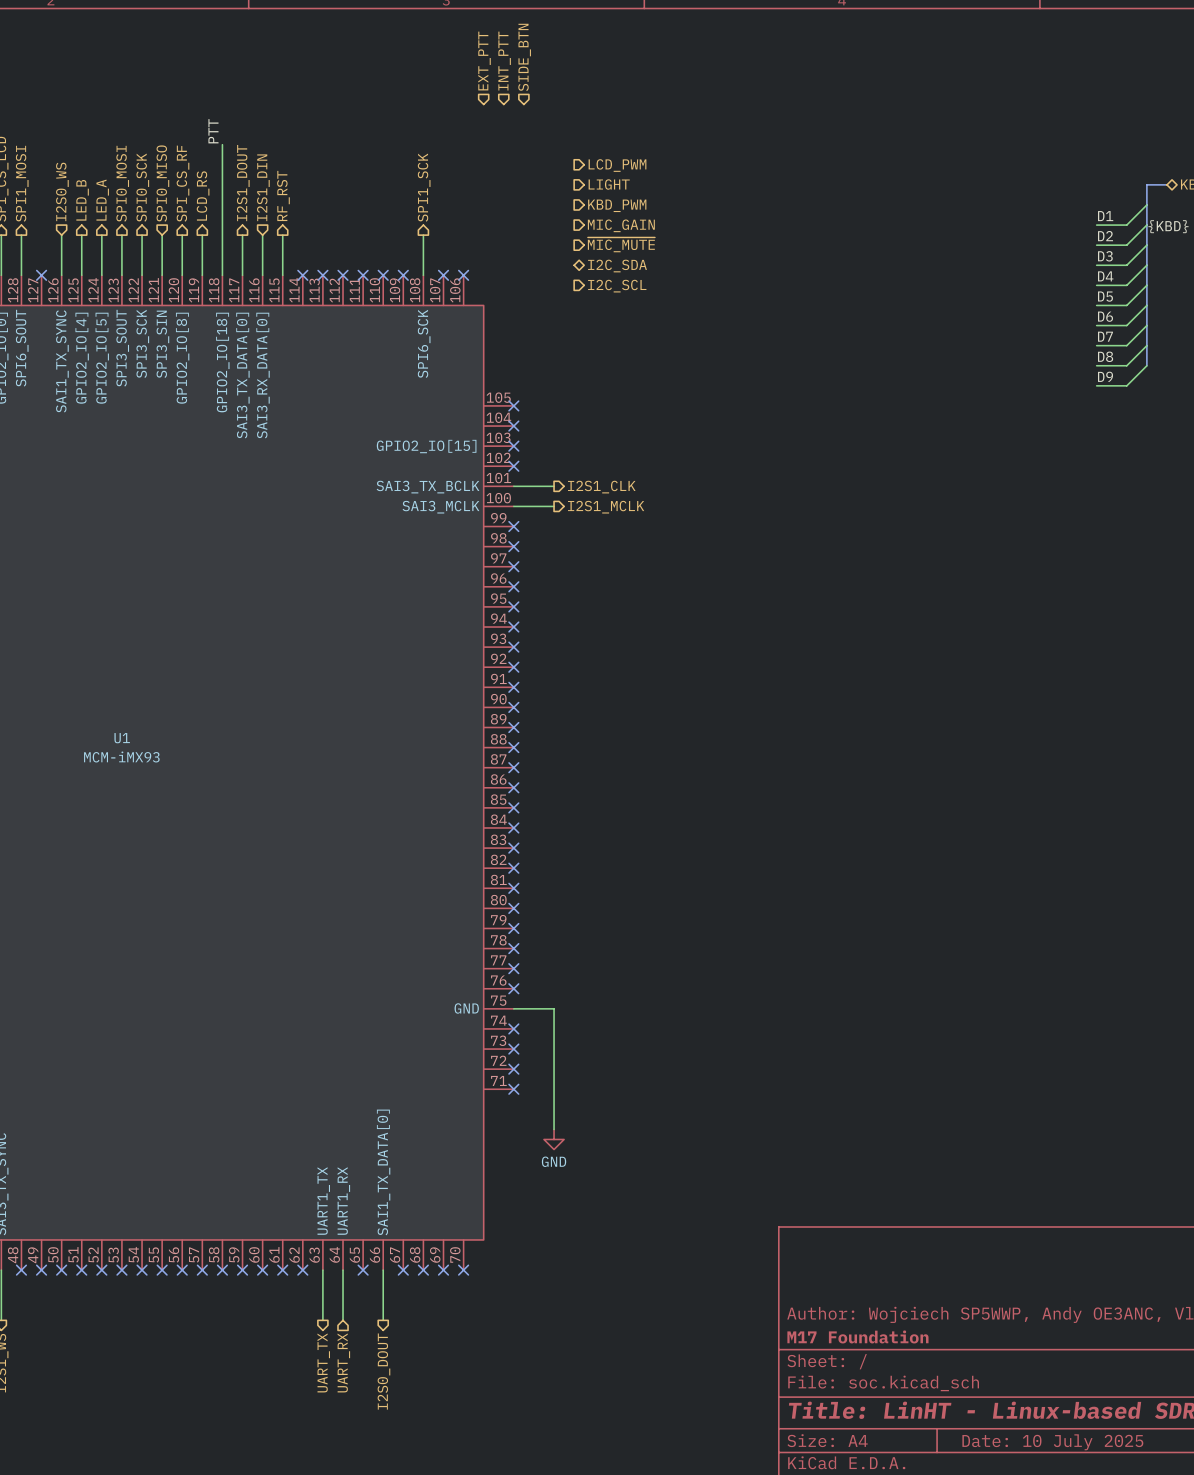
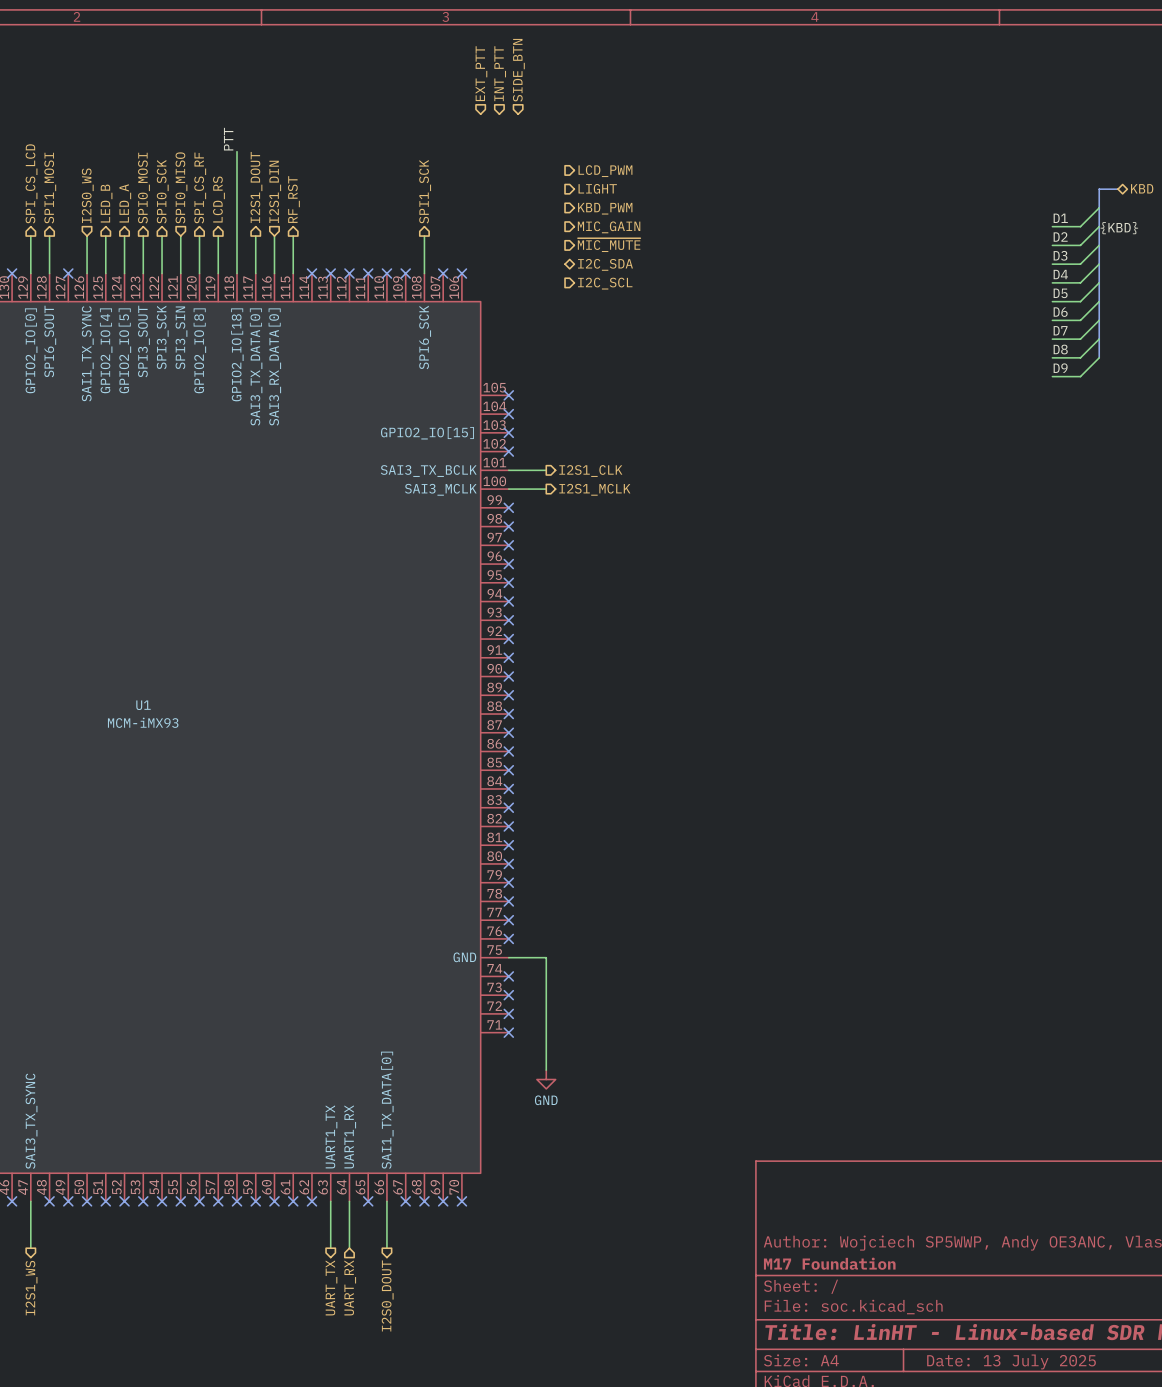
title block: Date: 10 July 2025 (1052, 1442) -> Date: 13 July 2025 (1011, 1361)

